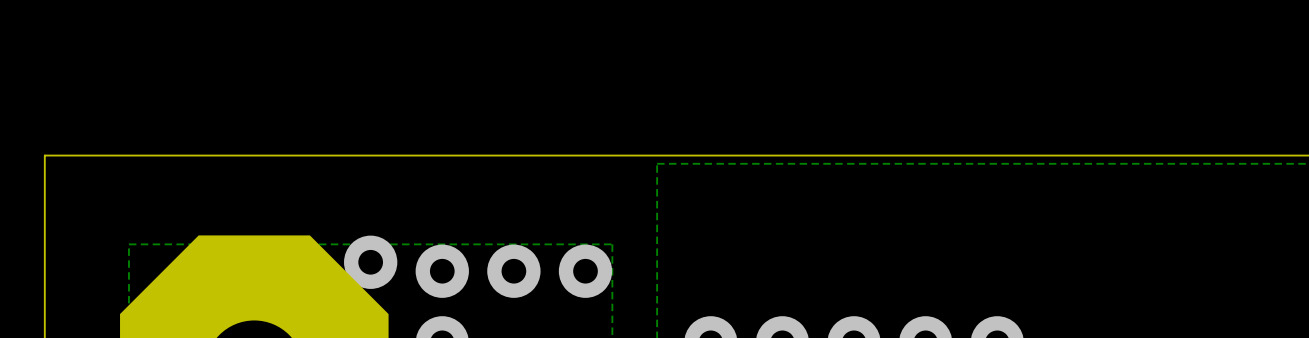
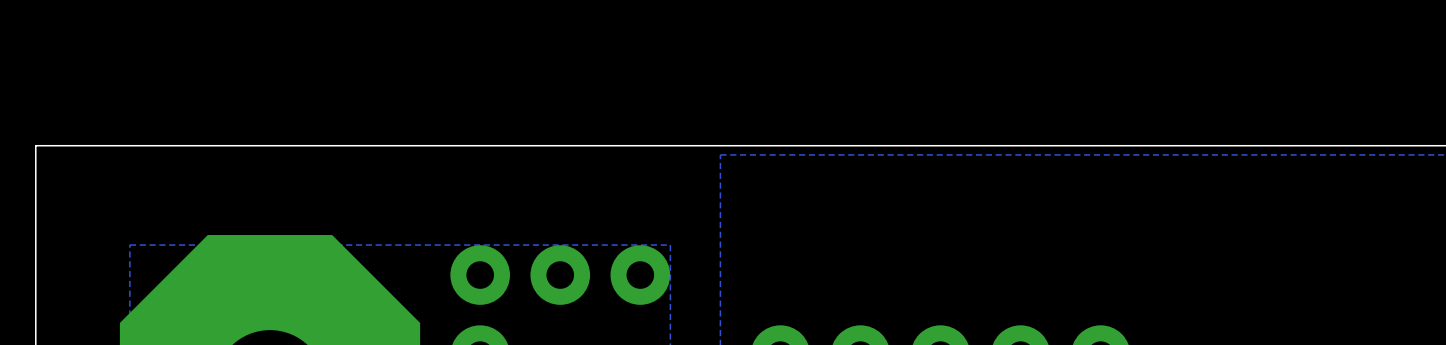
via: (370, 262) -> none

